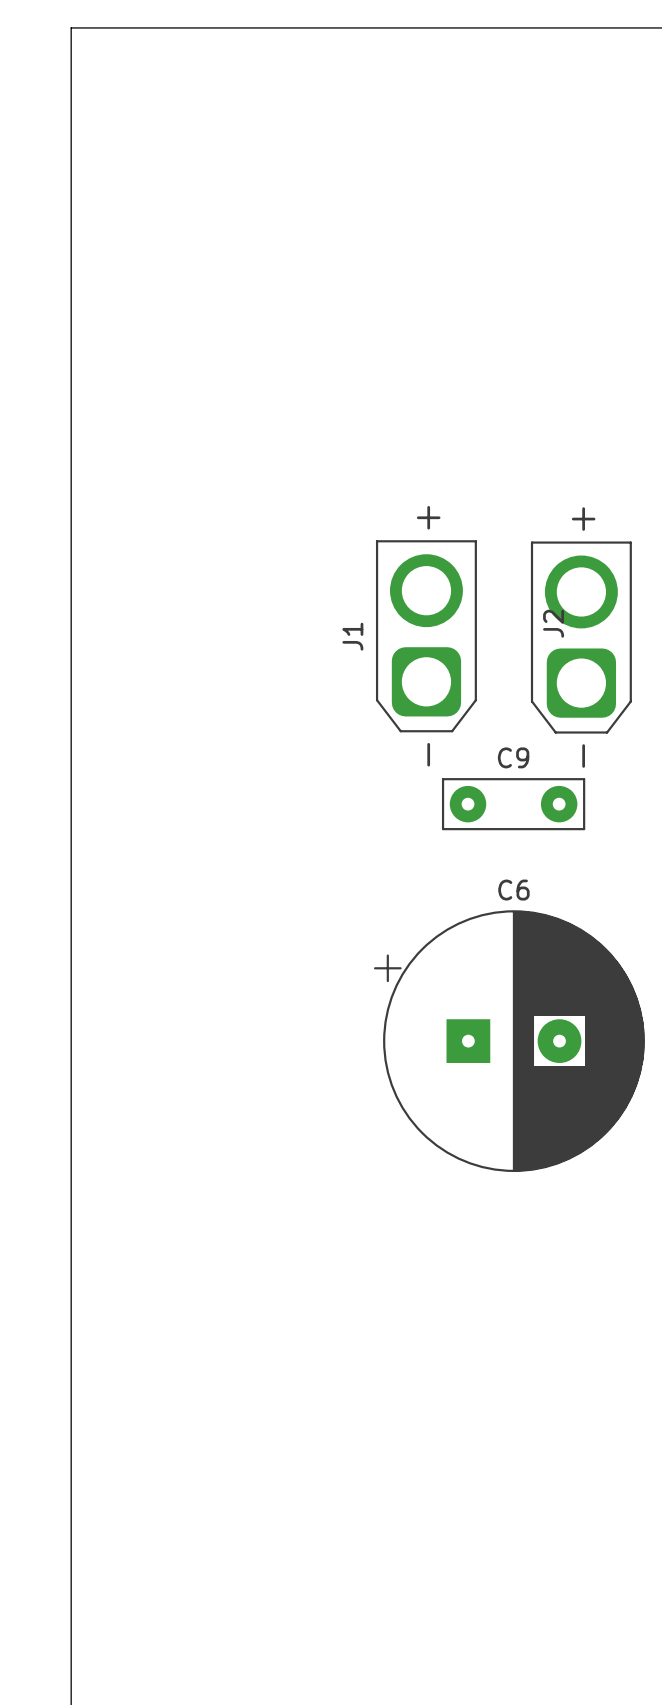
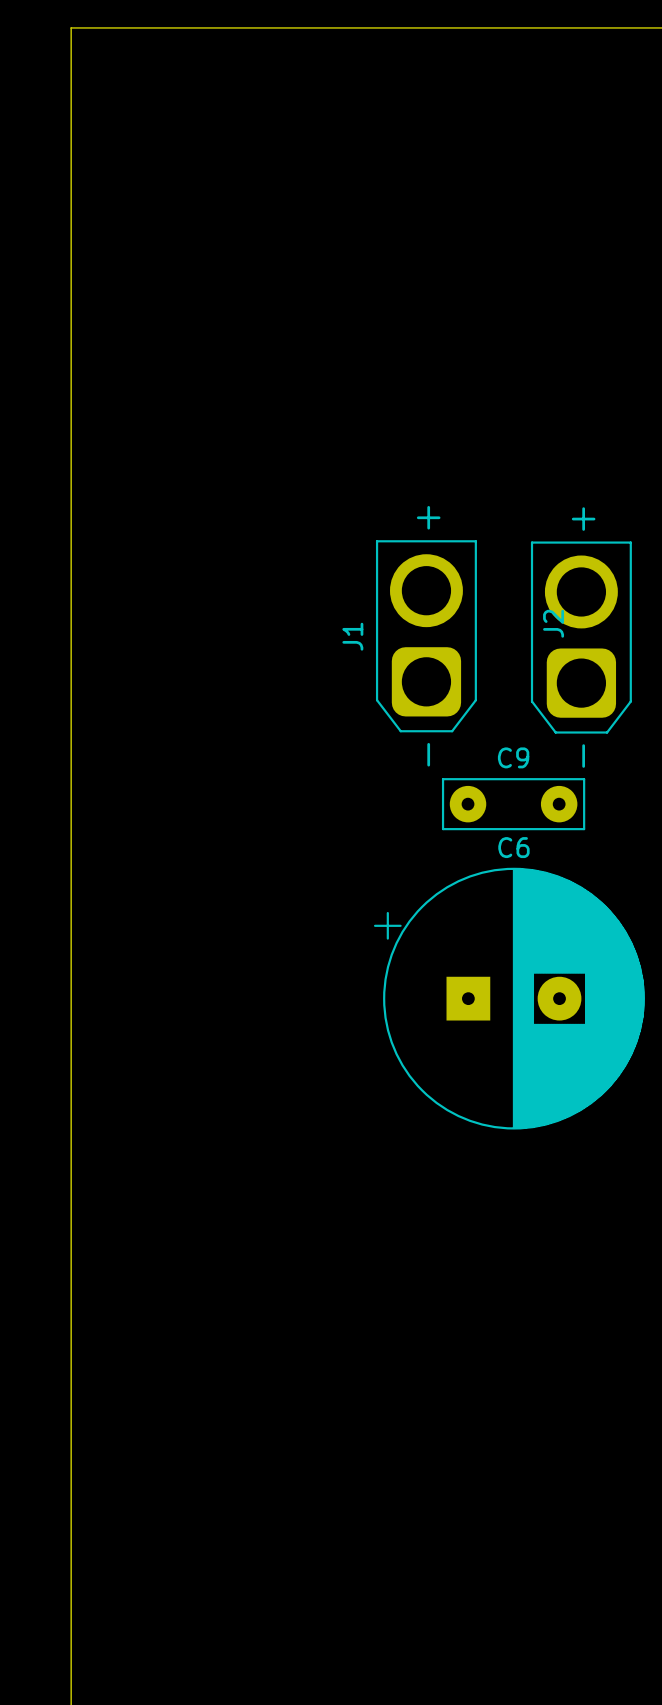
C6 position: (509, 1041) -> (509, 998)

